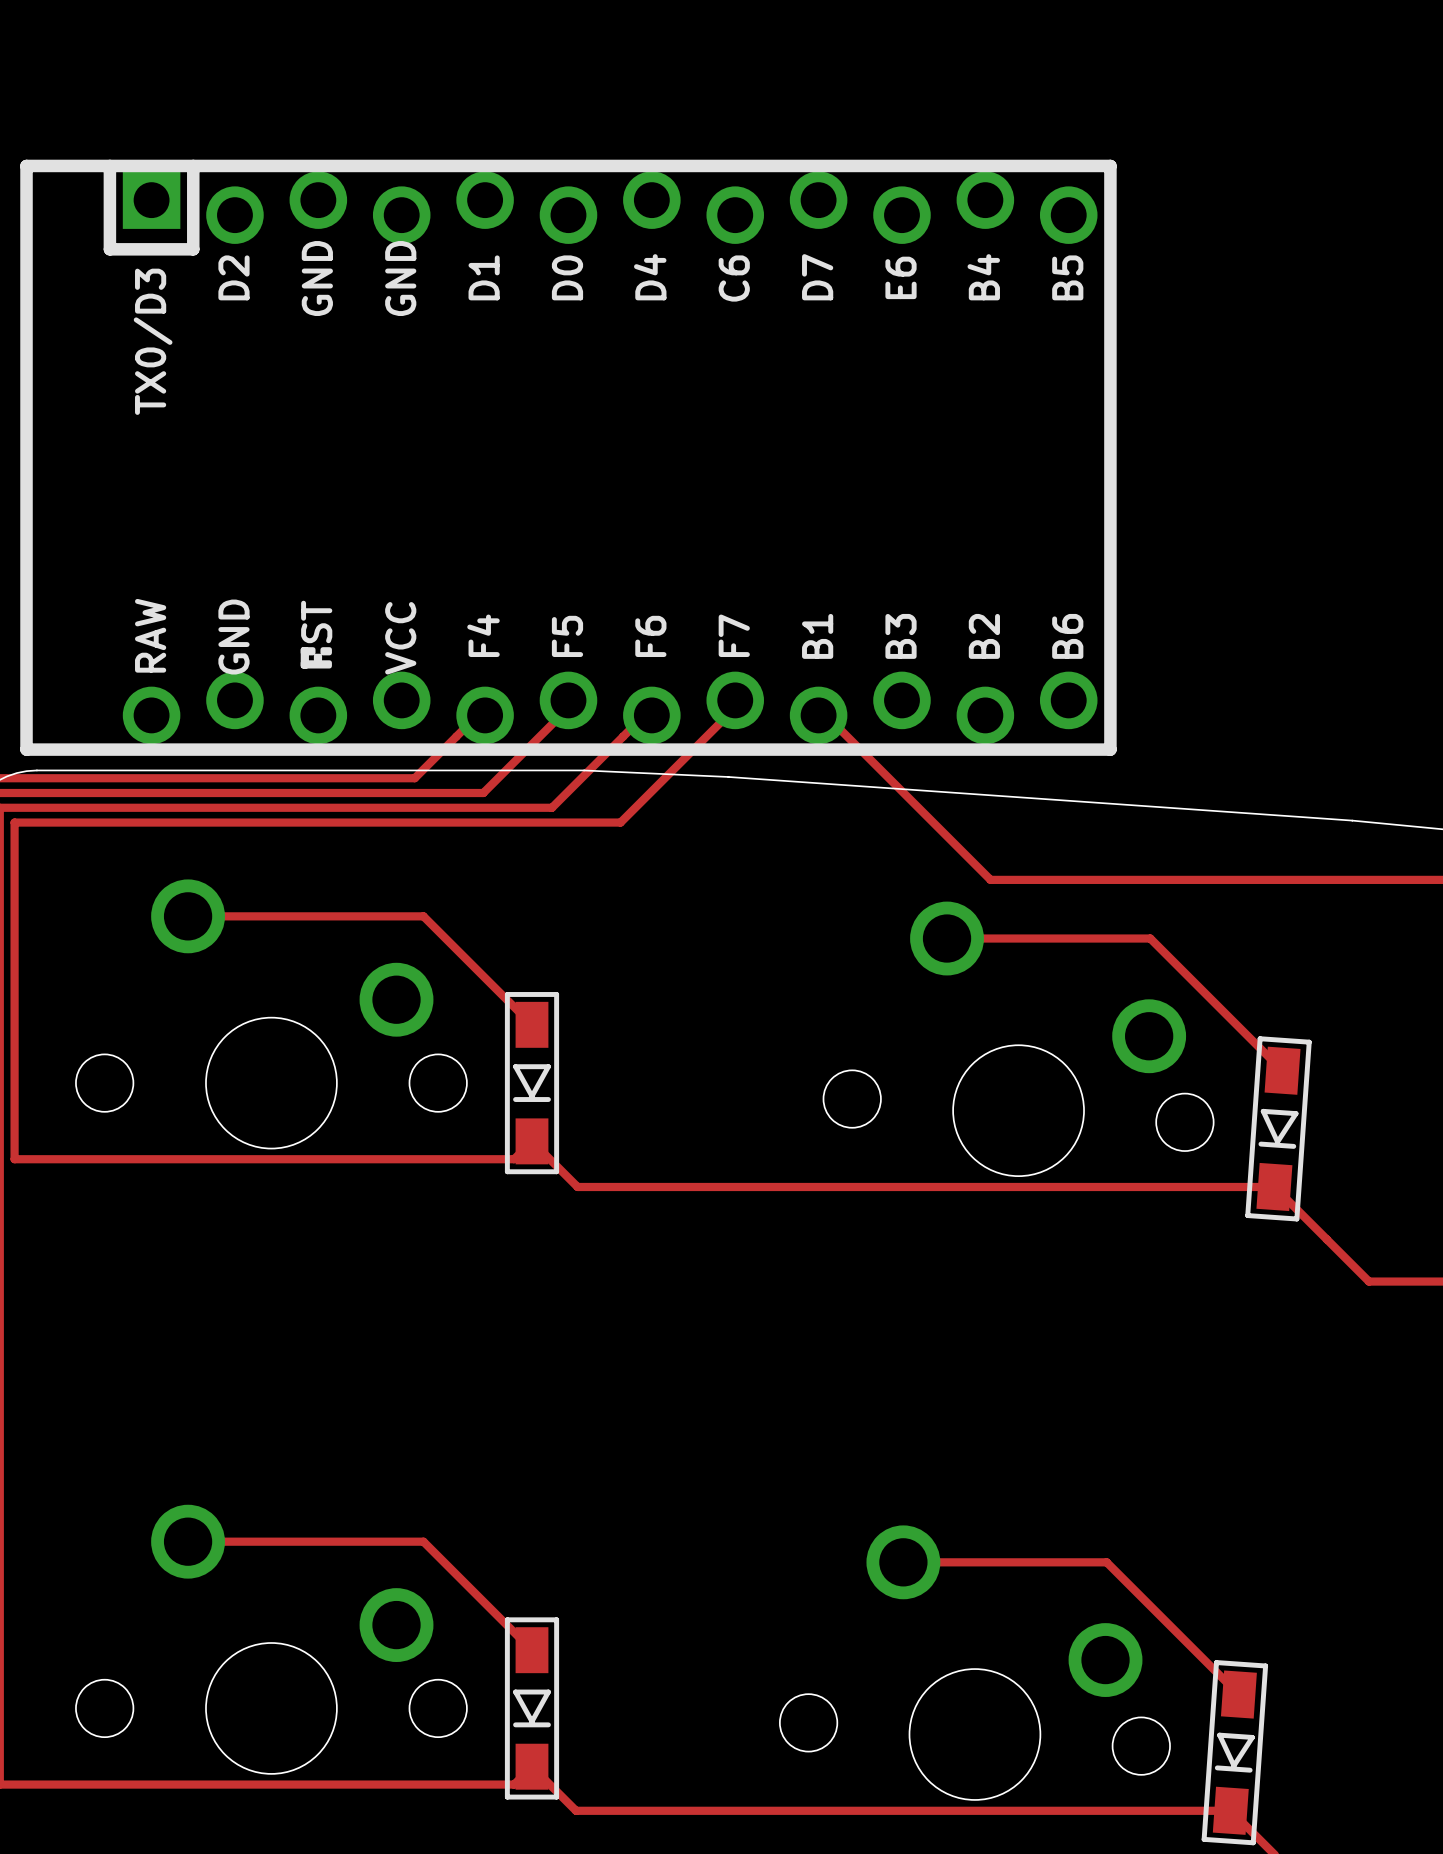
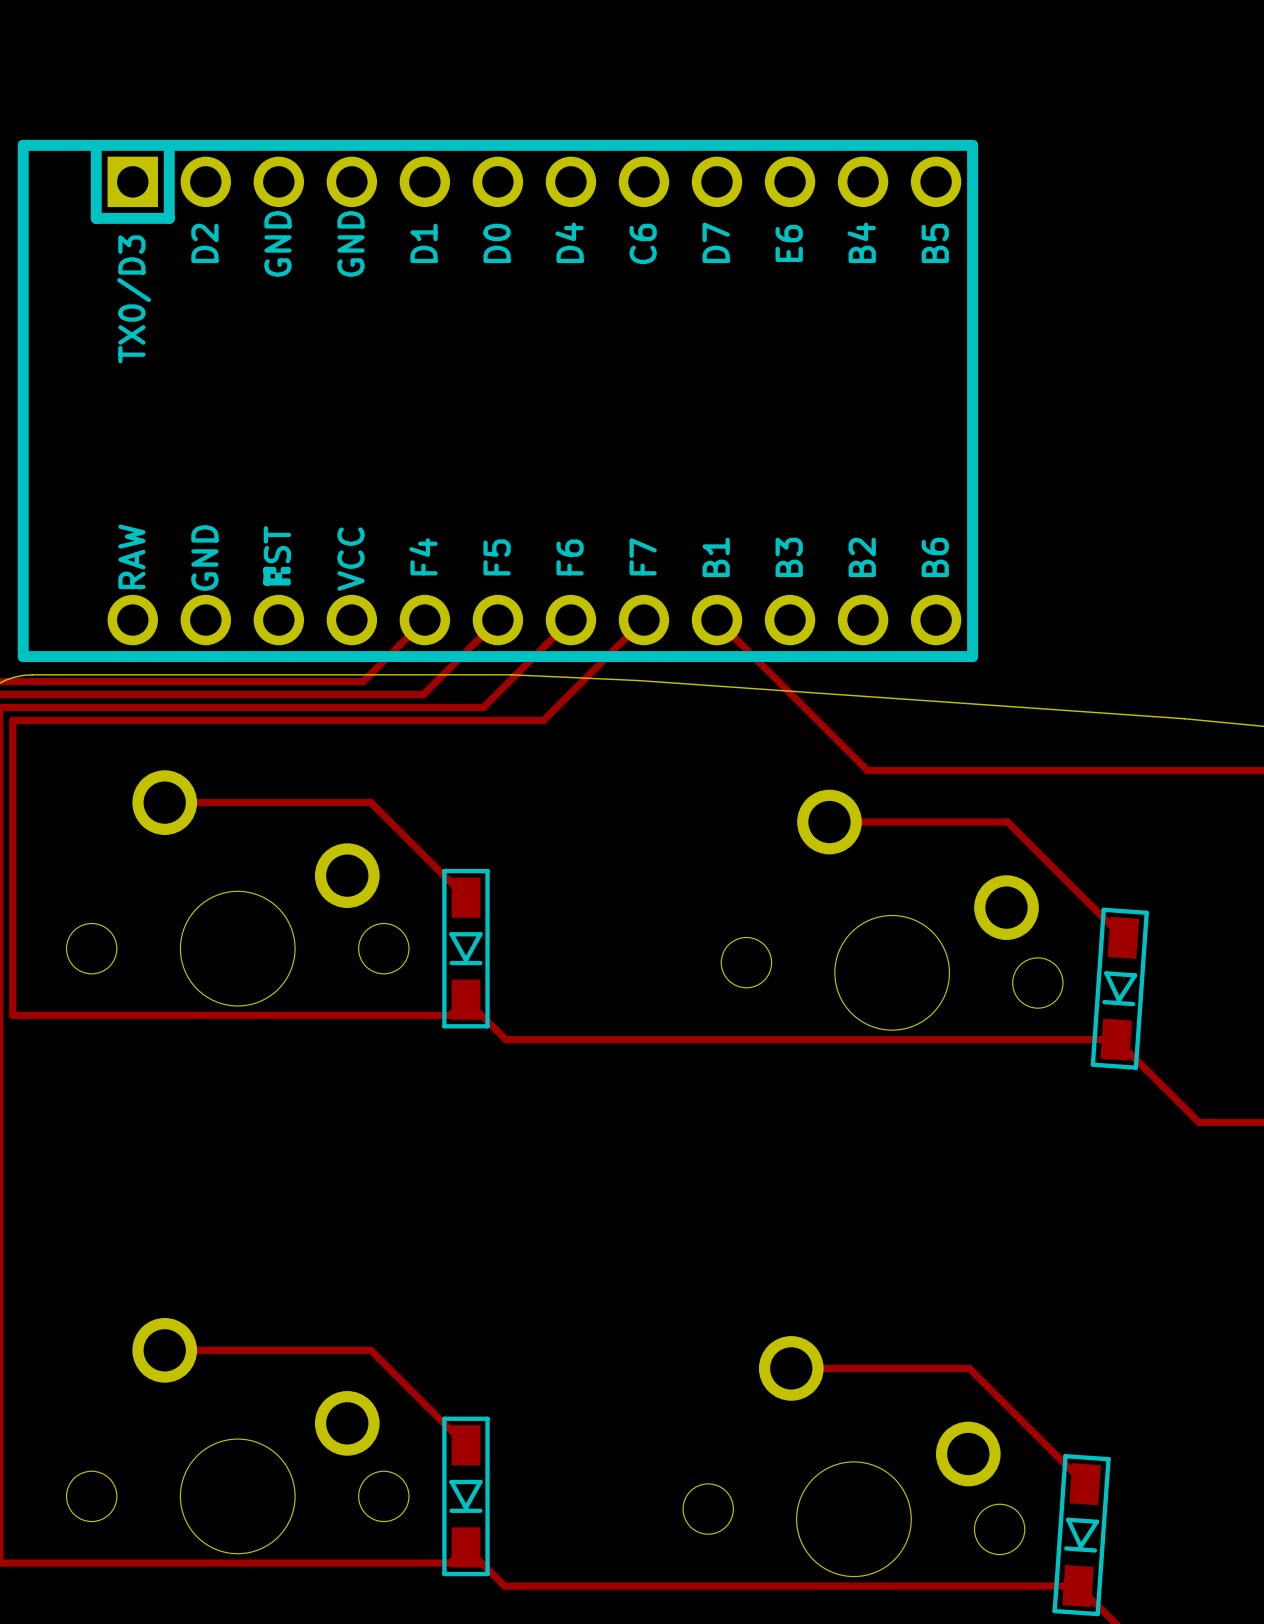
part footprint: [20, 159, 1117, 756] -> [17, 139, 979, 663]

